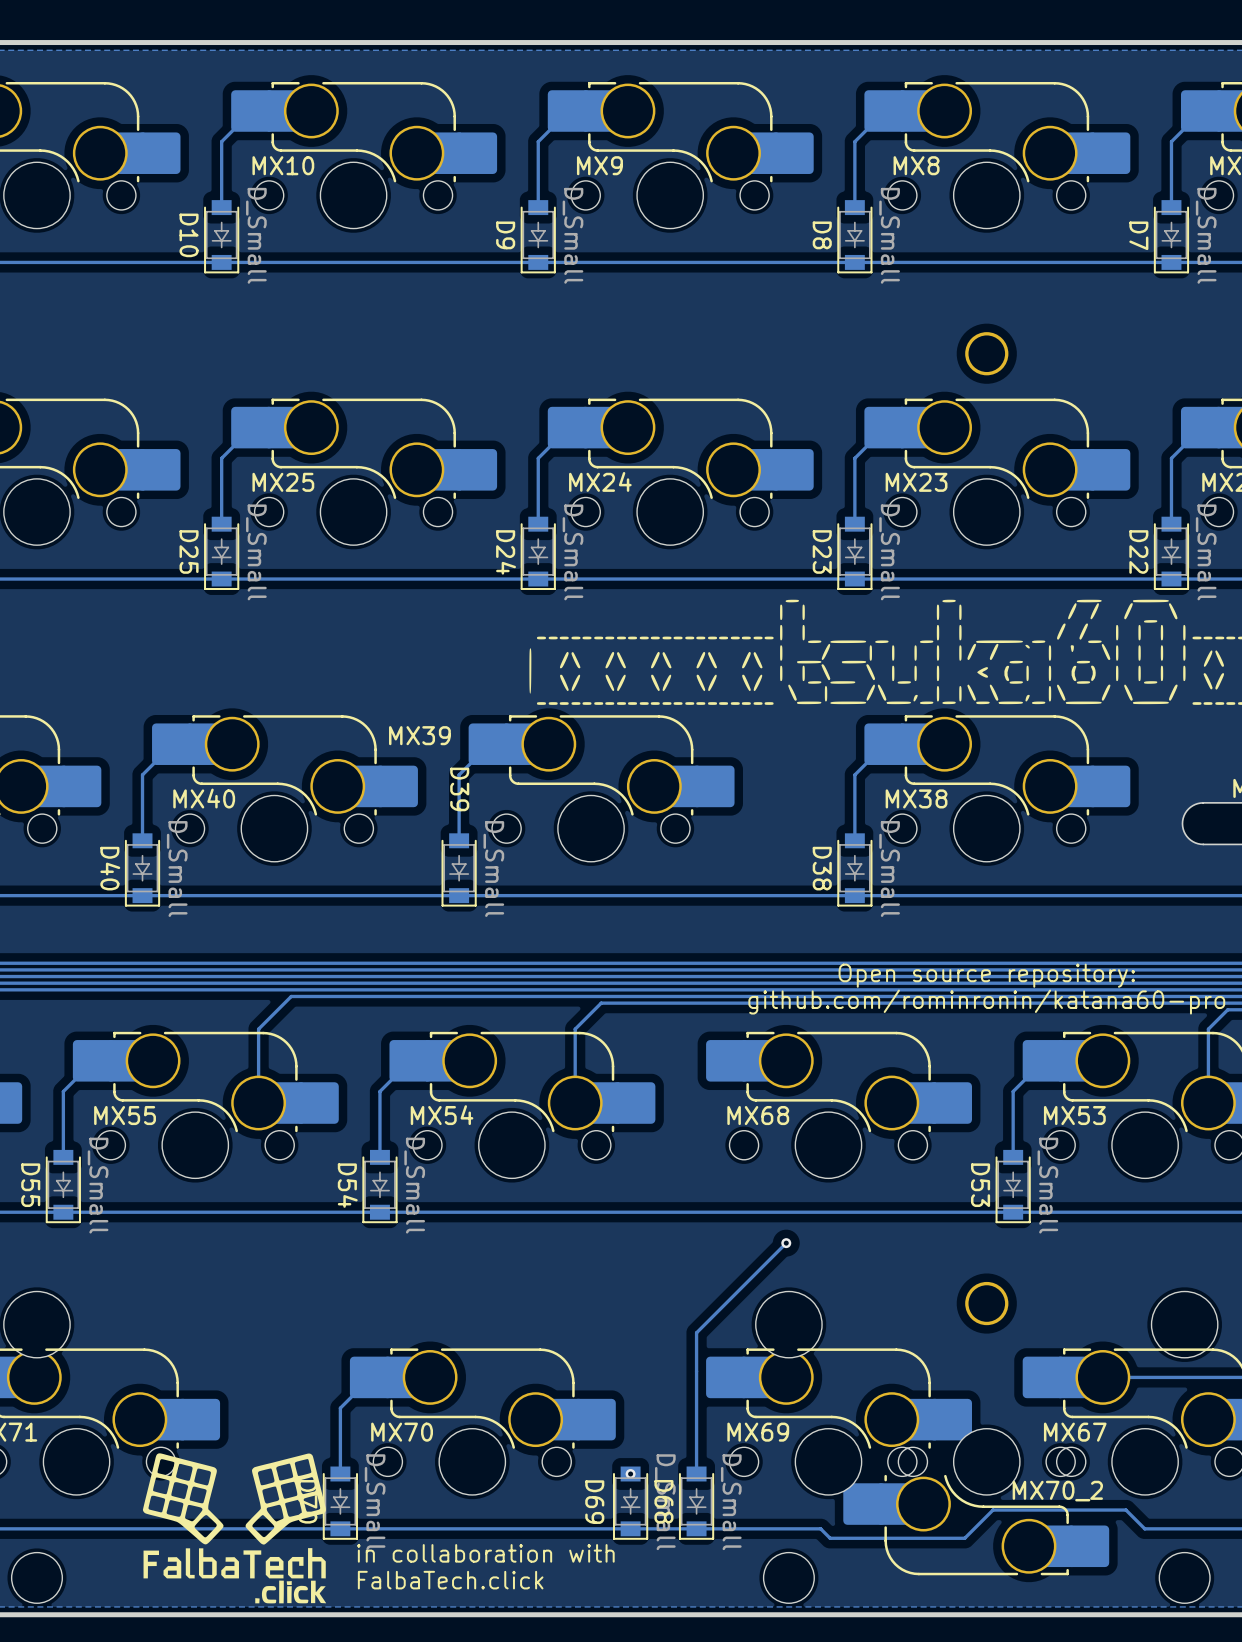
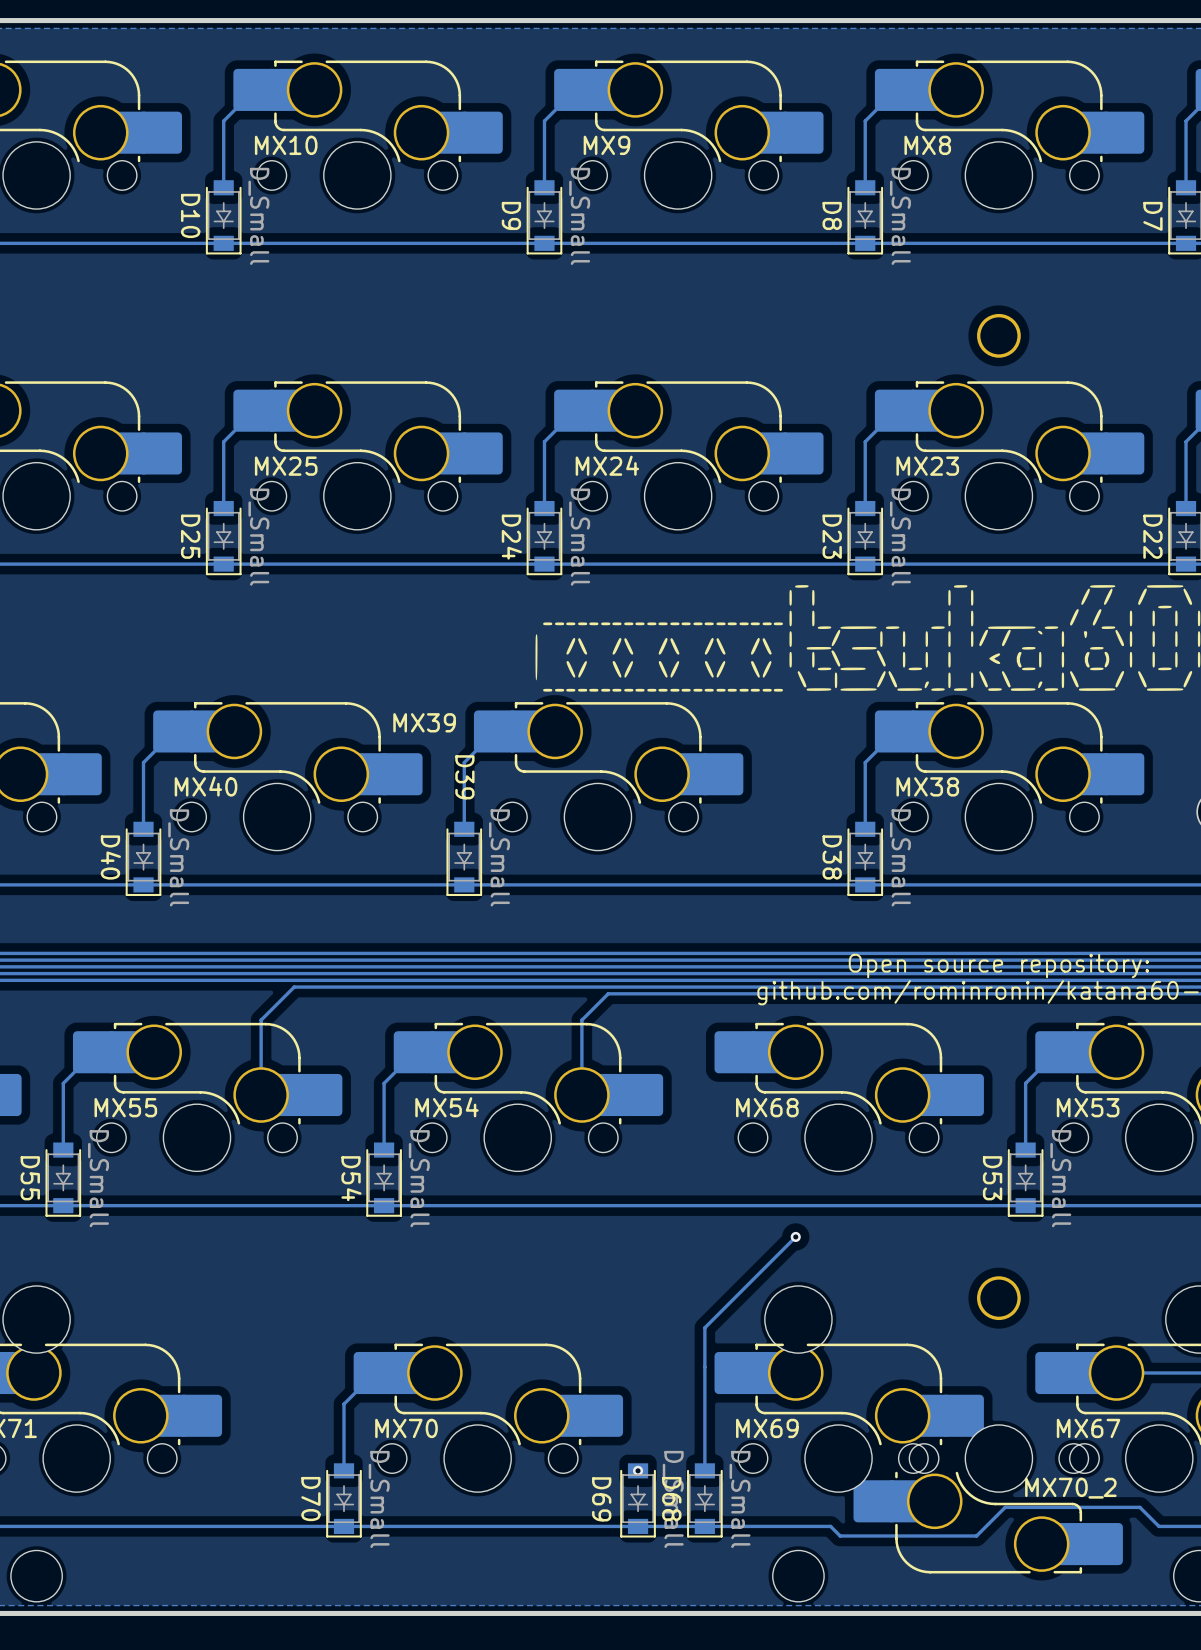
drawing: [142, 1453, 327, 1604] -> none
text: in collaboration with (485, 1553) -> none
text: FalbaTech.click (450, 1580) -> none

